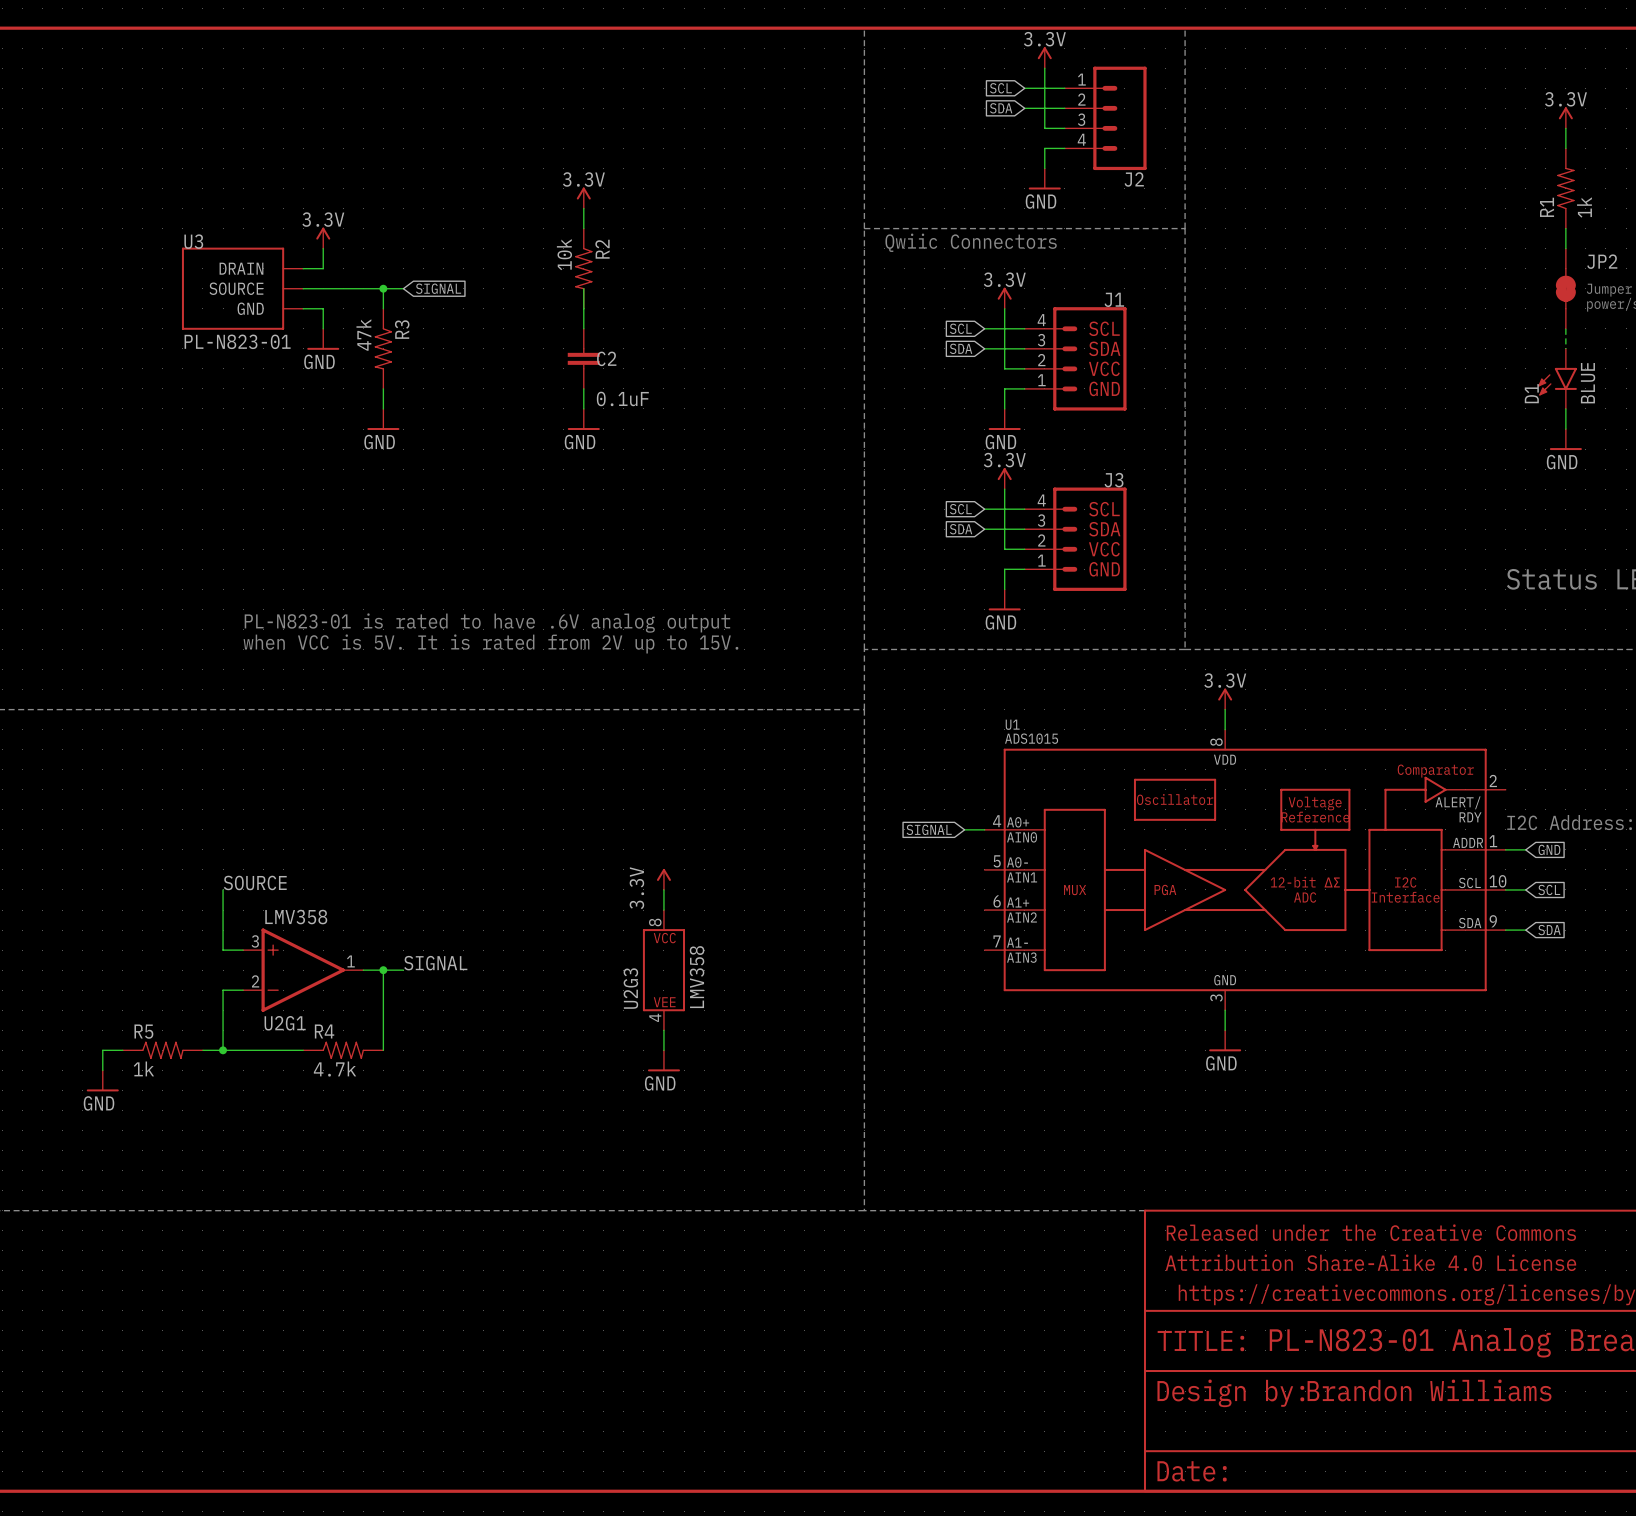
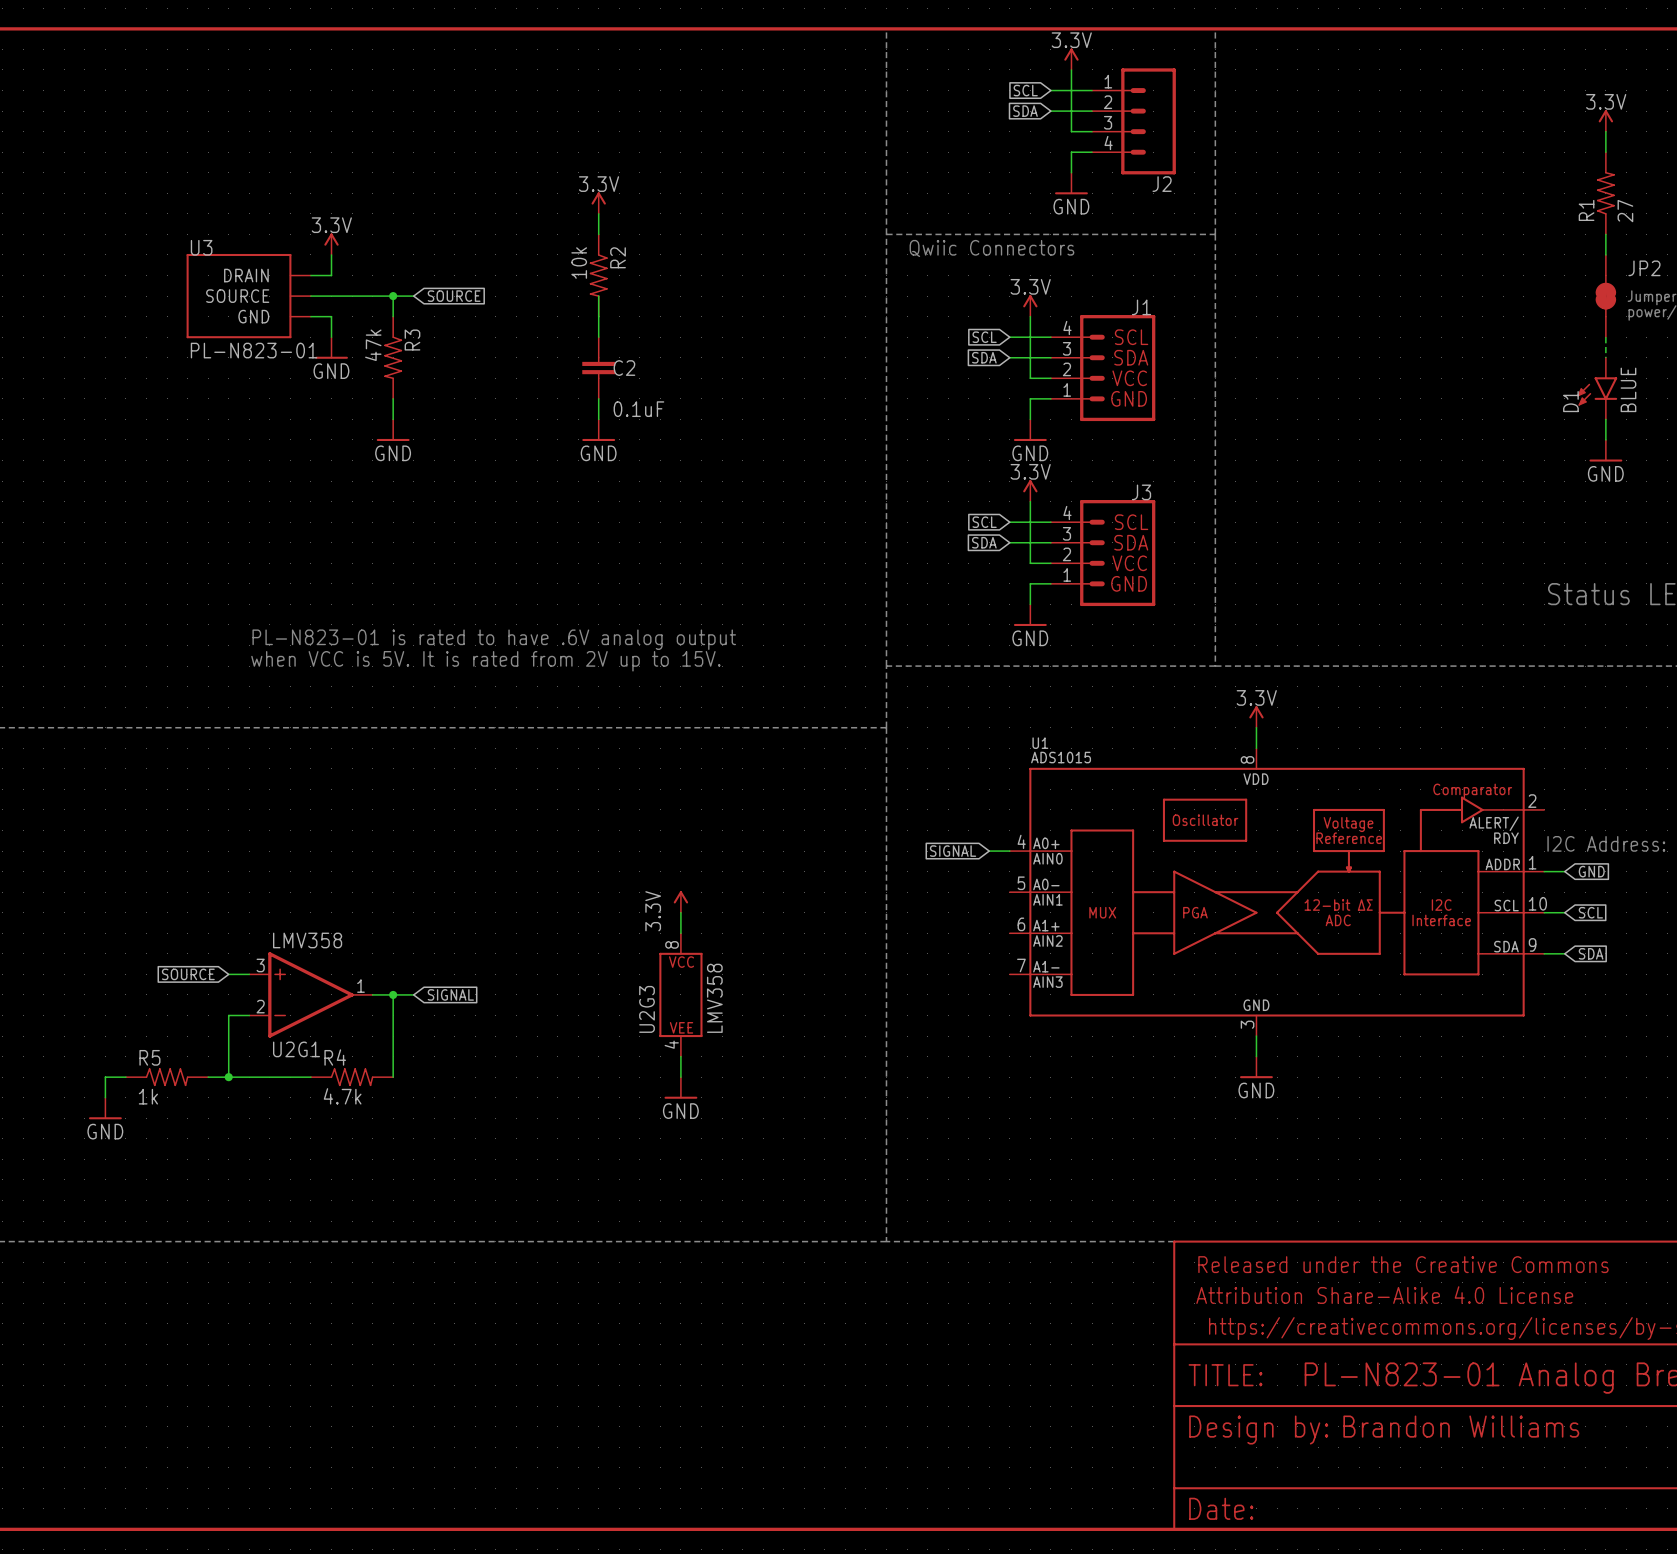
R1 value: 1k (1584, 207) -> 27 (1625, 211)
global label: SIGNAL (438, 288) -> SOURCE (454, 296)
label: SOURCE (255, 882) -> none
wire: (223, 889) (223, 950) -> none
global label: none -> SOURCE (188, 974)
label: SIGNAL (435, 963) -> none
global label: none -> SIGNAL (450, 994)

